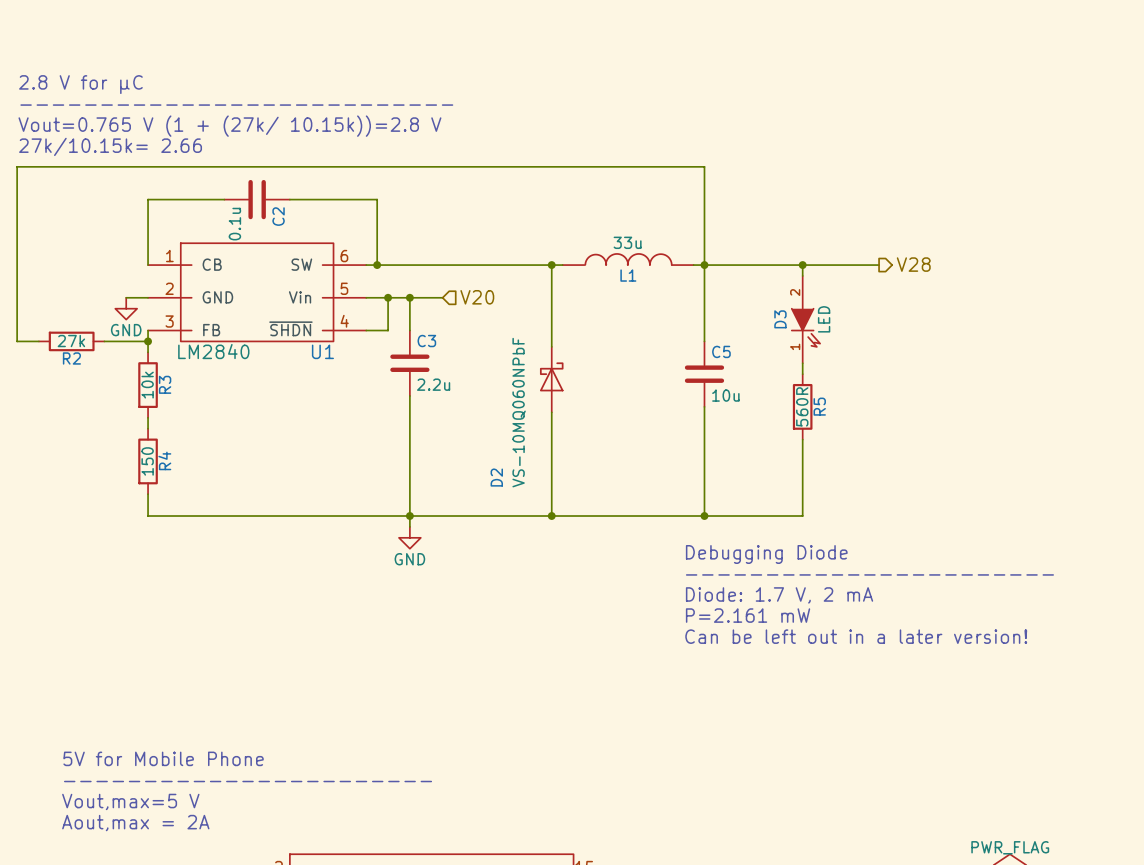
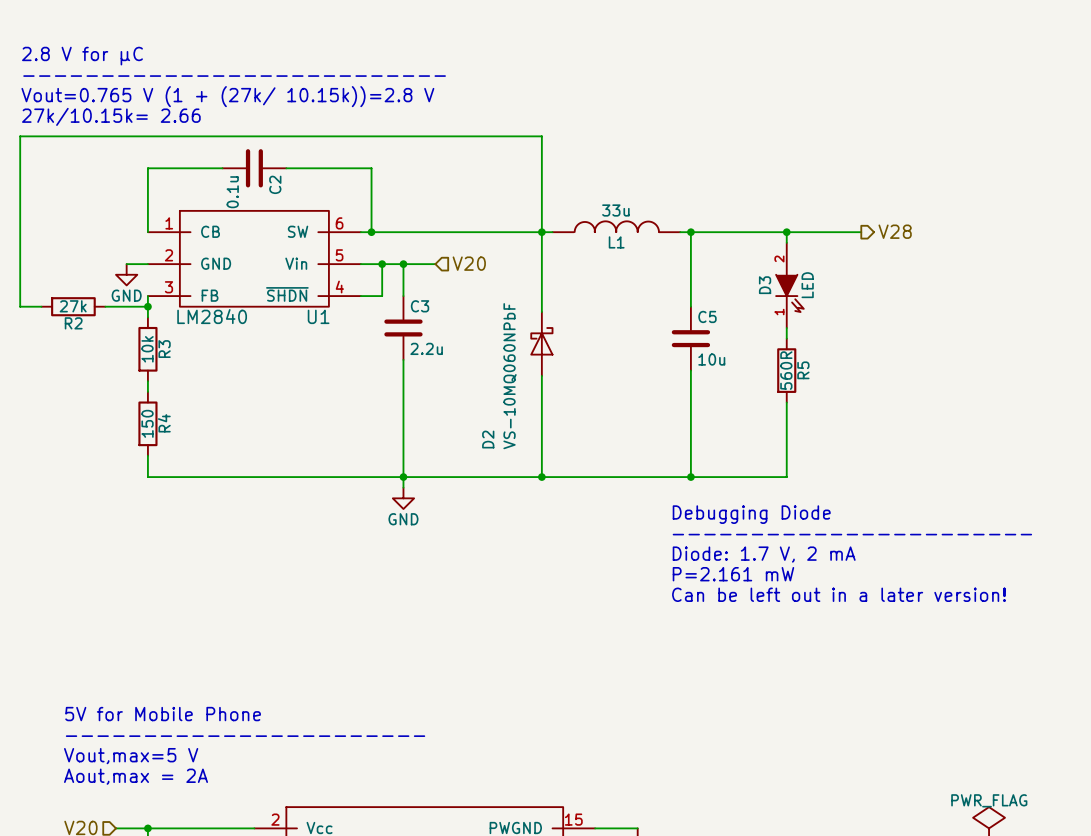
wire: (551, 166) (704, 166) (704, 265) -> (541, 136) (541, 232)

